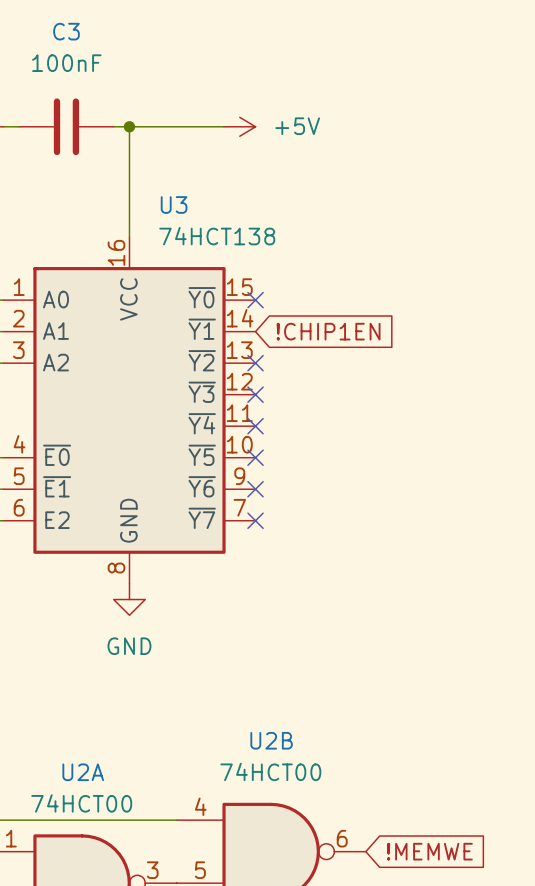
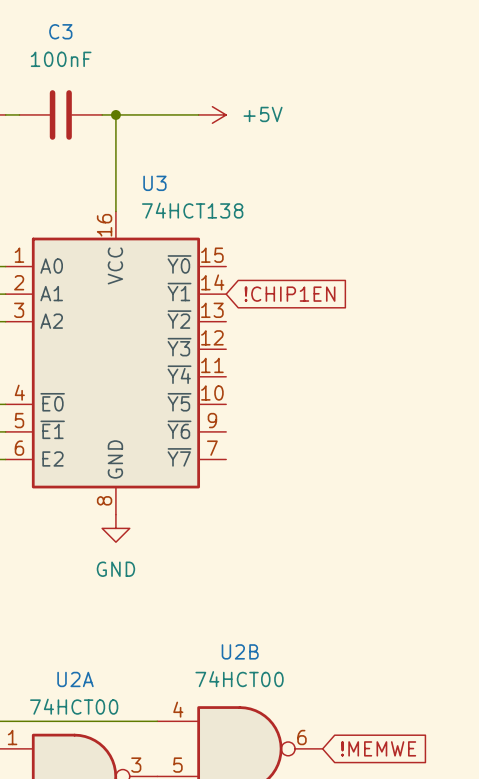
no-connect mark: (255, 300) -> none
no-connect mark: (255, 363) -> none
no-connect mark: (255, 394) -> none
no-connect mark: (255, 426) -> none
no-connect mark: (255, 457) -> none
no-connect mark: (255, 489) -> none
no-connect mark: (255, 520) -> none

